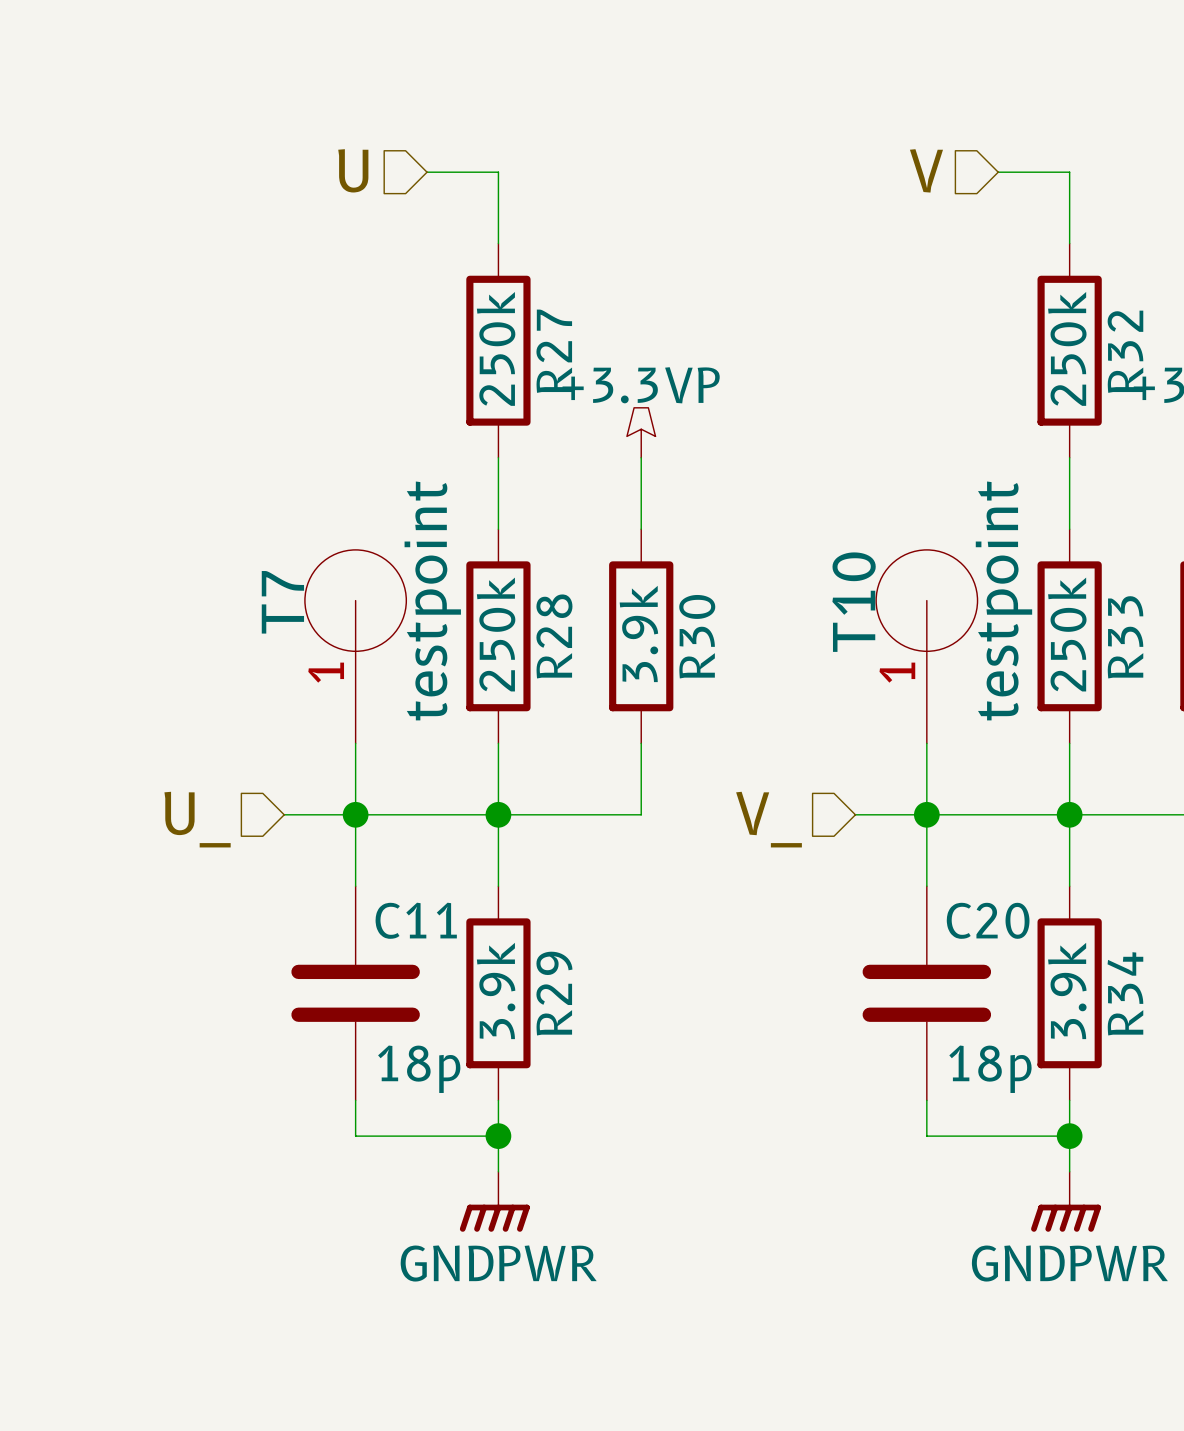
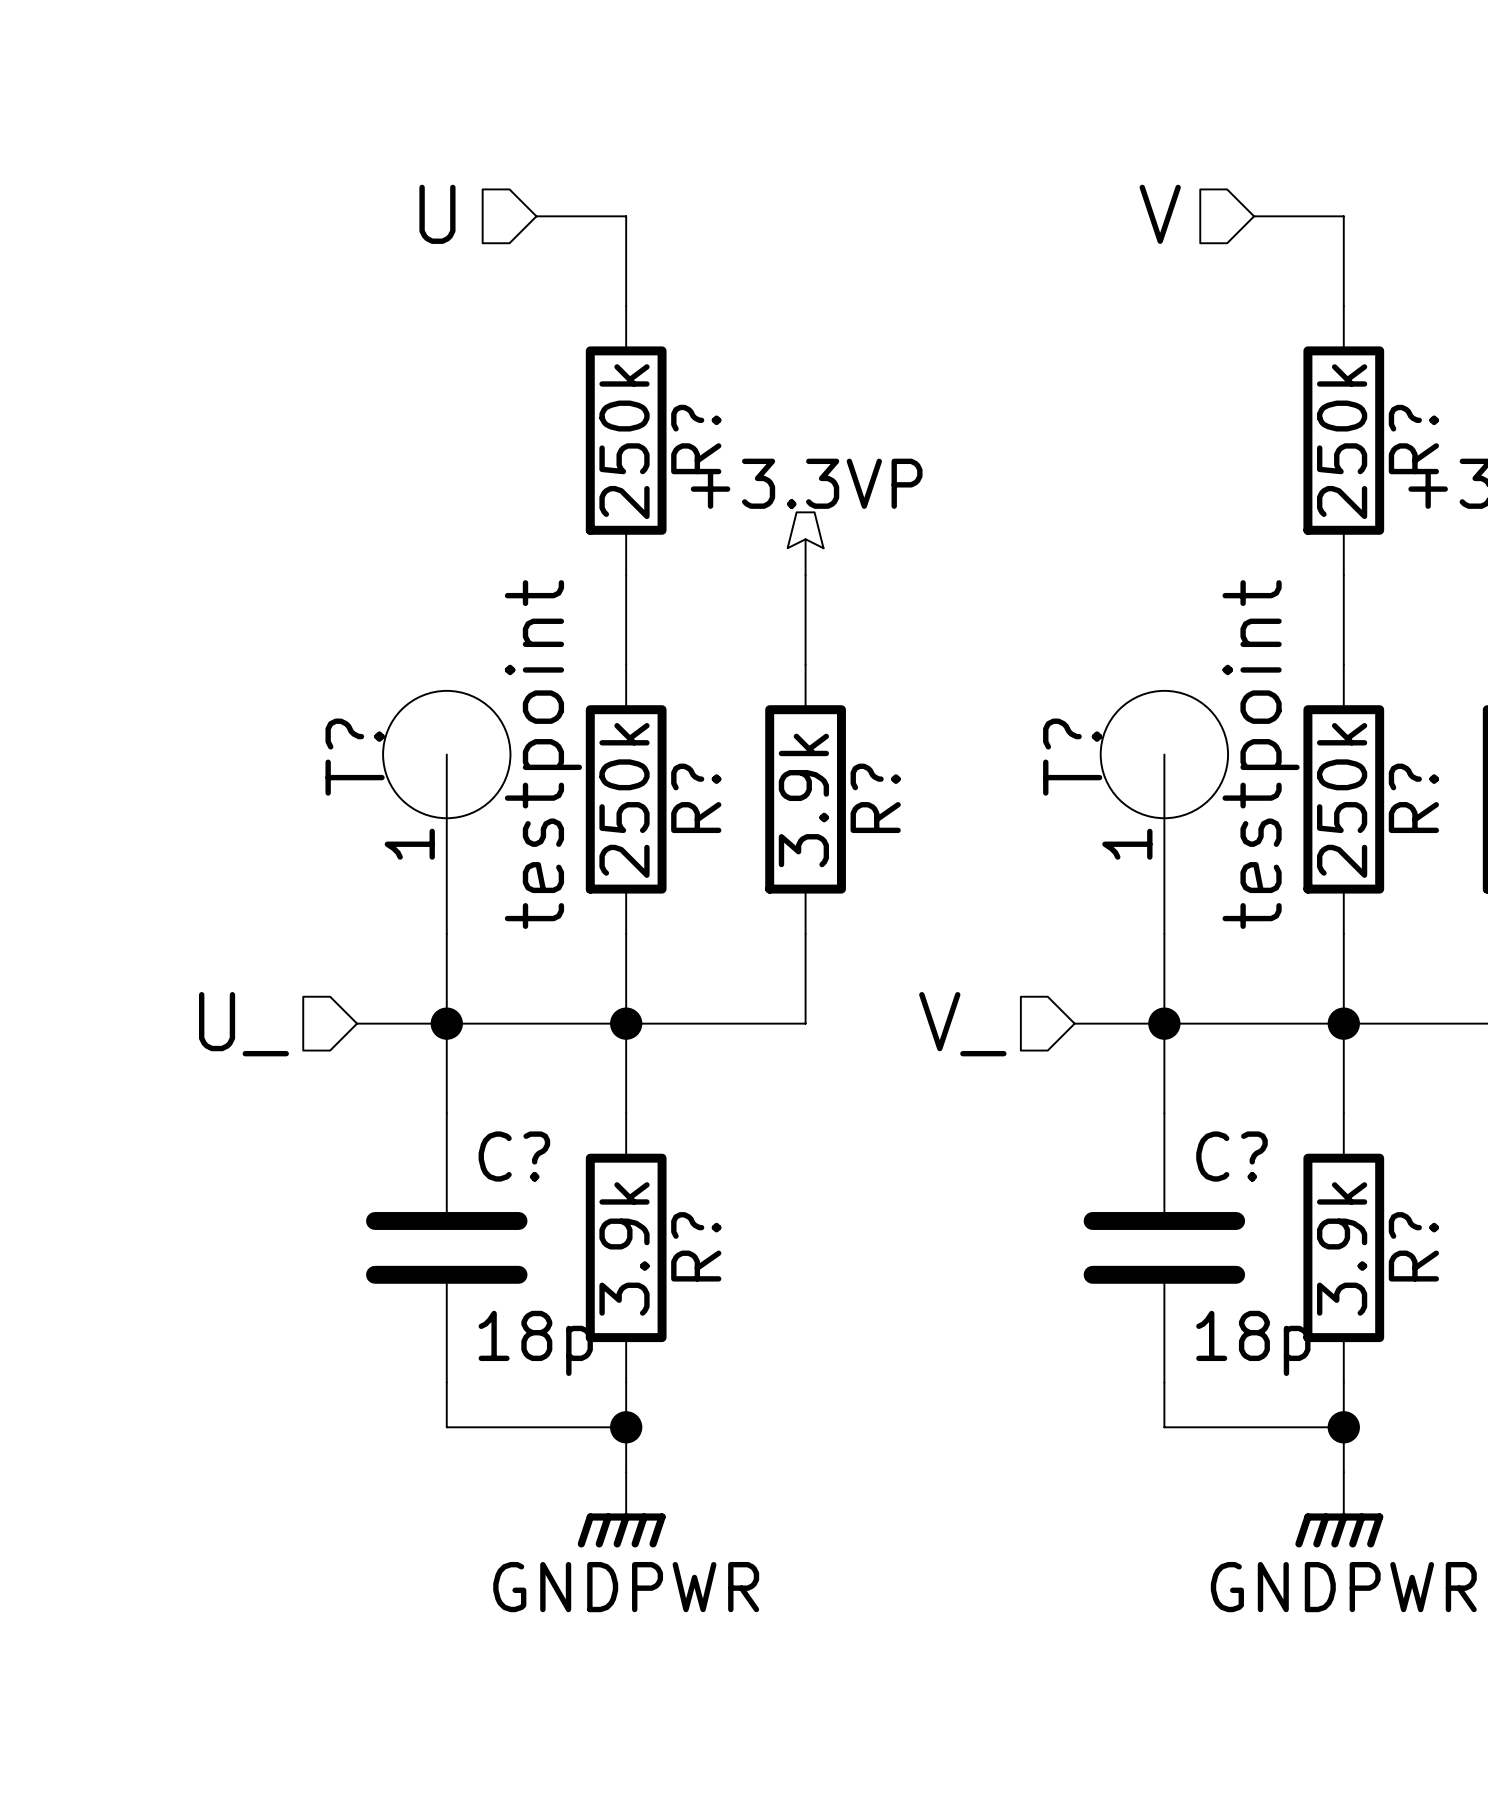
R27 name: R27 (554, 351) -> R? (696, 439)
R32 name: R32 (1125, 351) -> R? (1413, 439)
T7 name: T7 (282, 602) -> T? (355, 757)
T10 name: T10 (854, 602) -> T? (1072, 757)
R28 name: R28 (554, 636) -> R? (696, 798)
R30 name: R30 (697, 636) -> R? (875, 798)
R33 name: R33 (1125, 637) -> R? (1413, 798)
C11 name: C11 (416, 920) -> C? (514, 1156)
C20 name: C20 (988, 920) -> C? (1232, 1156)
R29 name: R29 (554, 993) -> R? (696, 1246)
R34 name: R34 (1125, 993) -> R? (1413, 1246)

